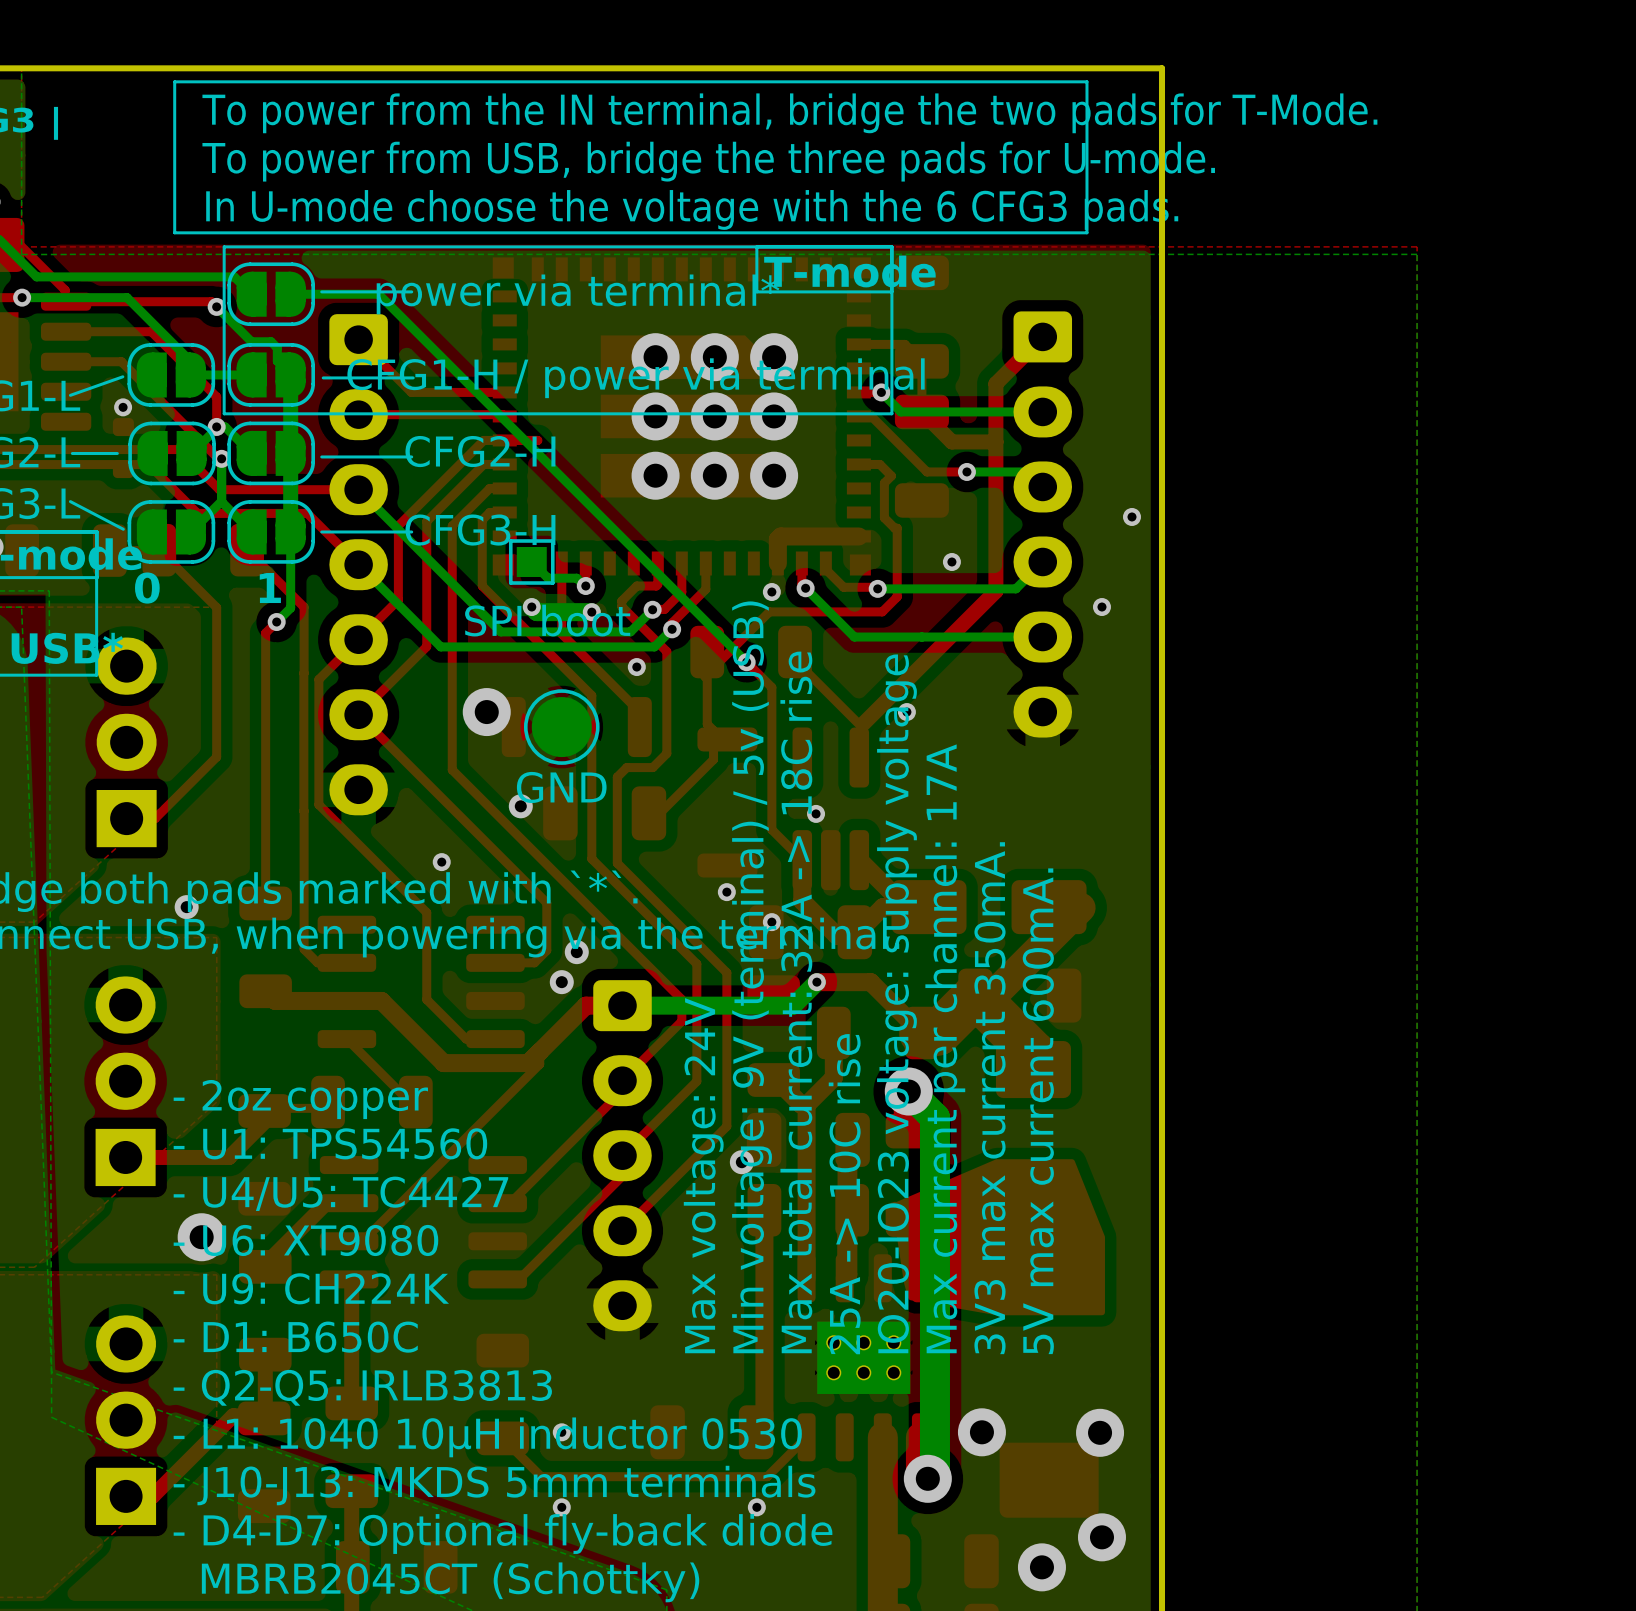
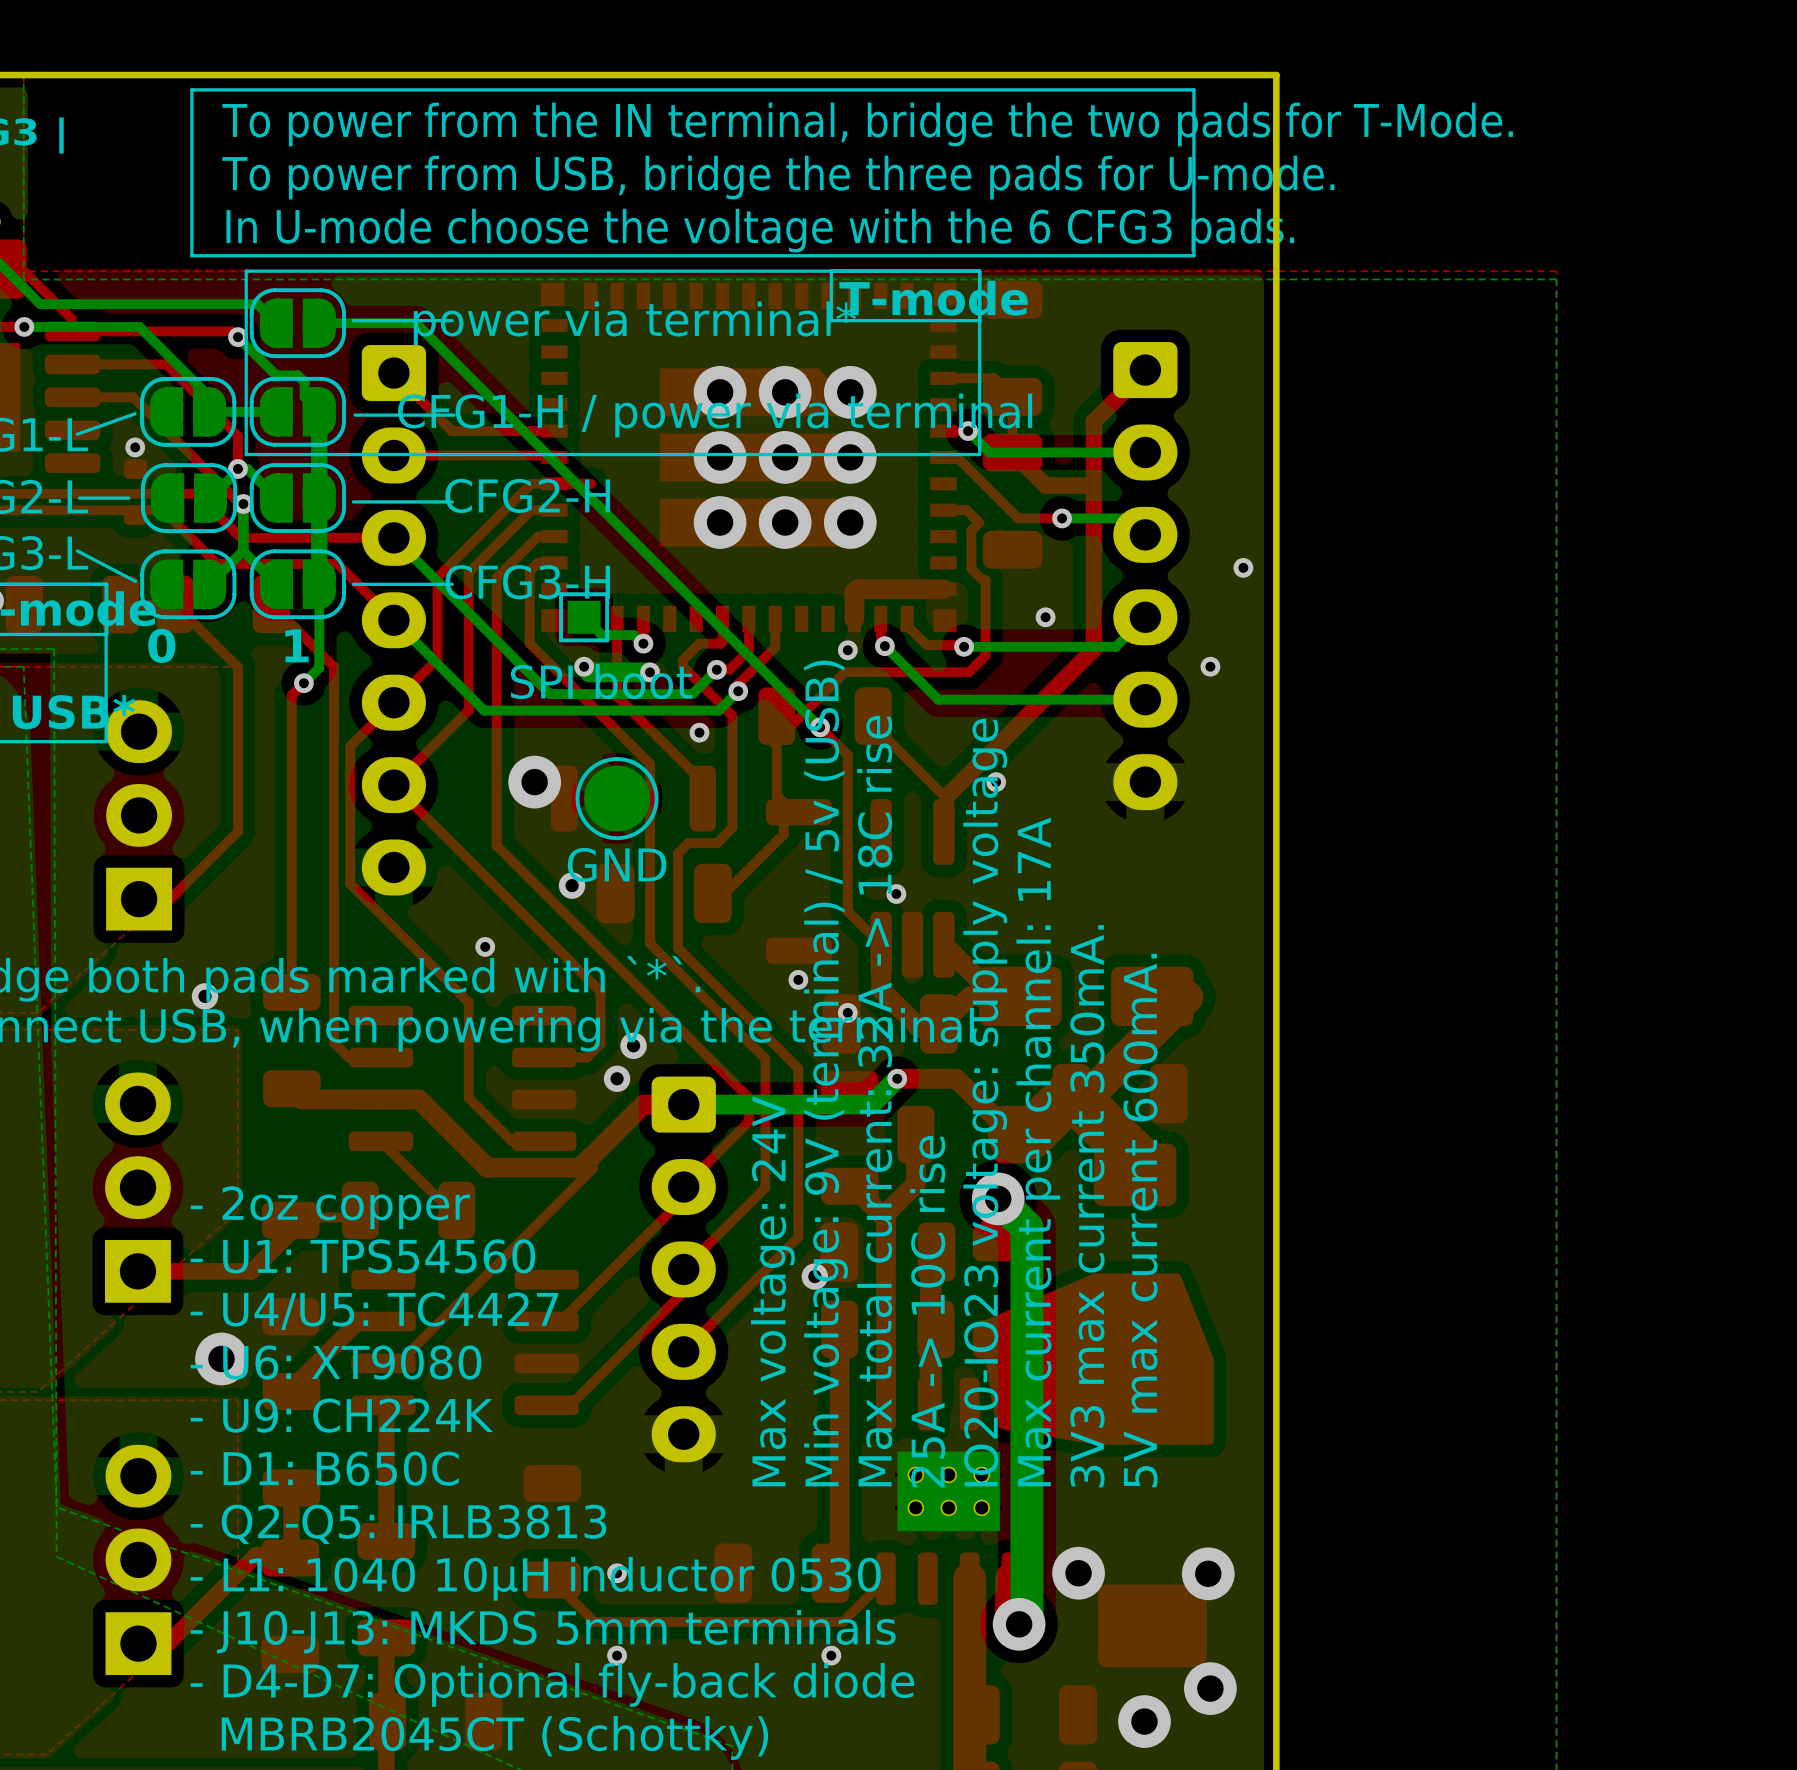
part value position: CFG1-H / power via terminal (636, 378) -> CFG1-H / power via terminal (715, 415)

